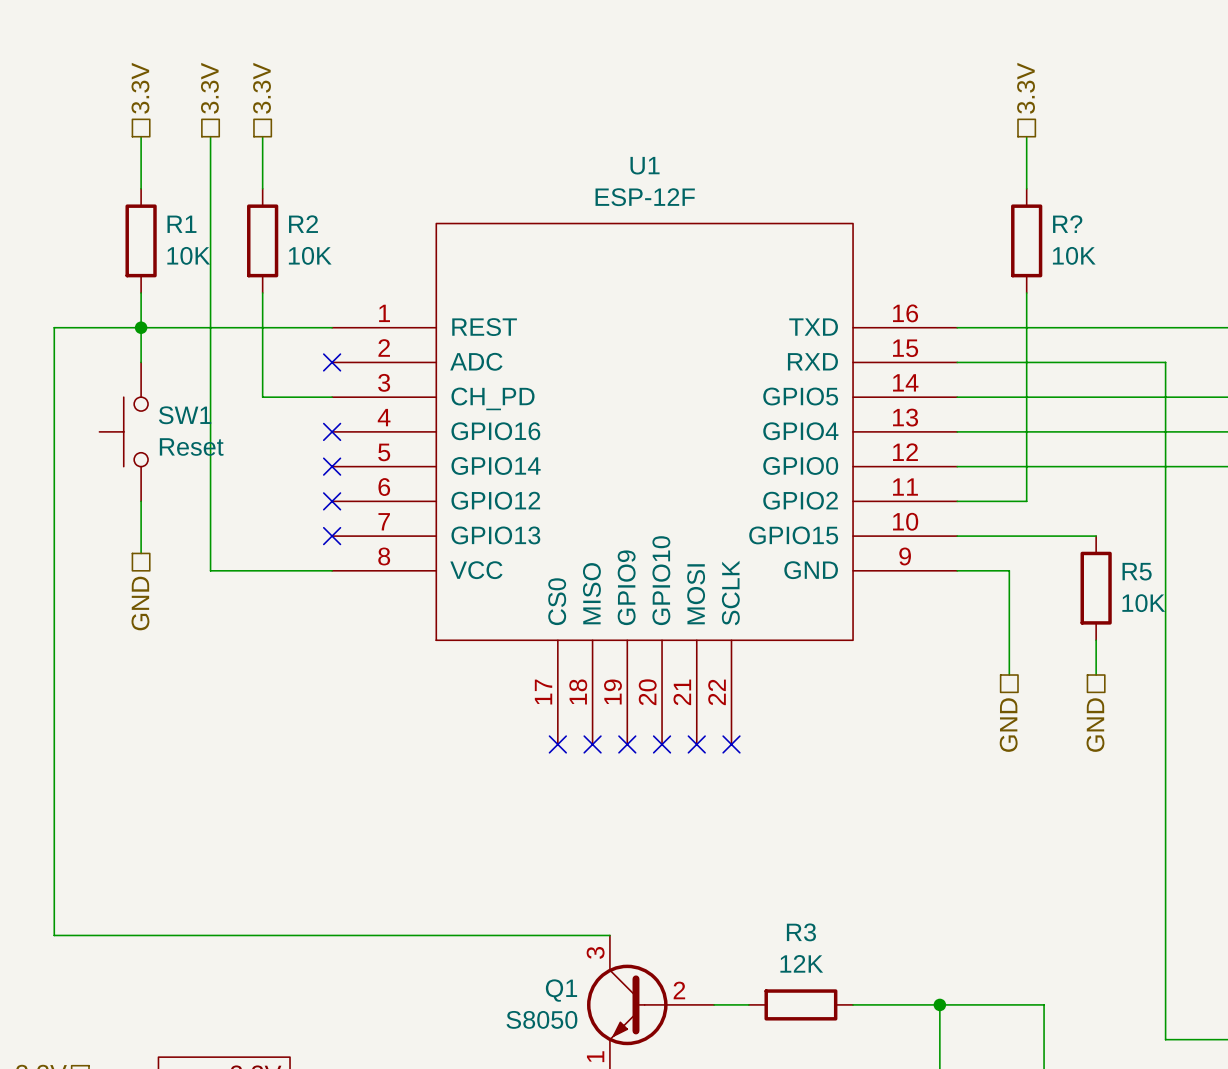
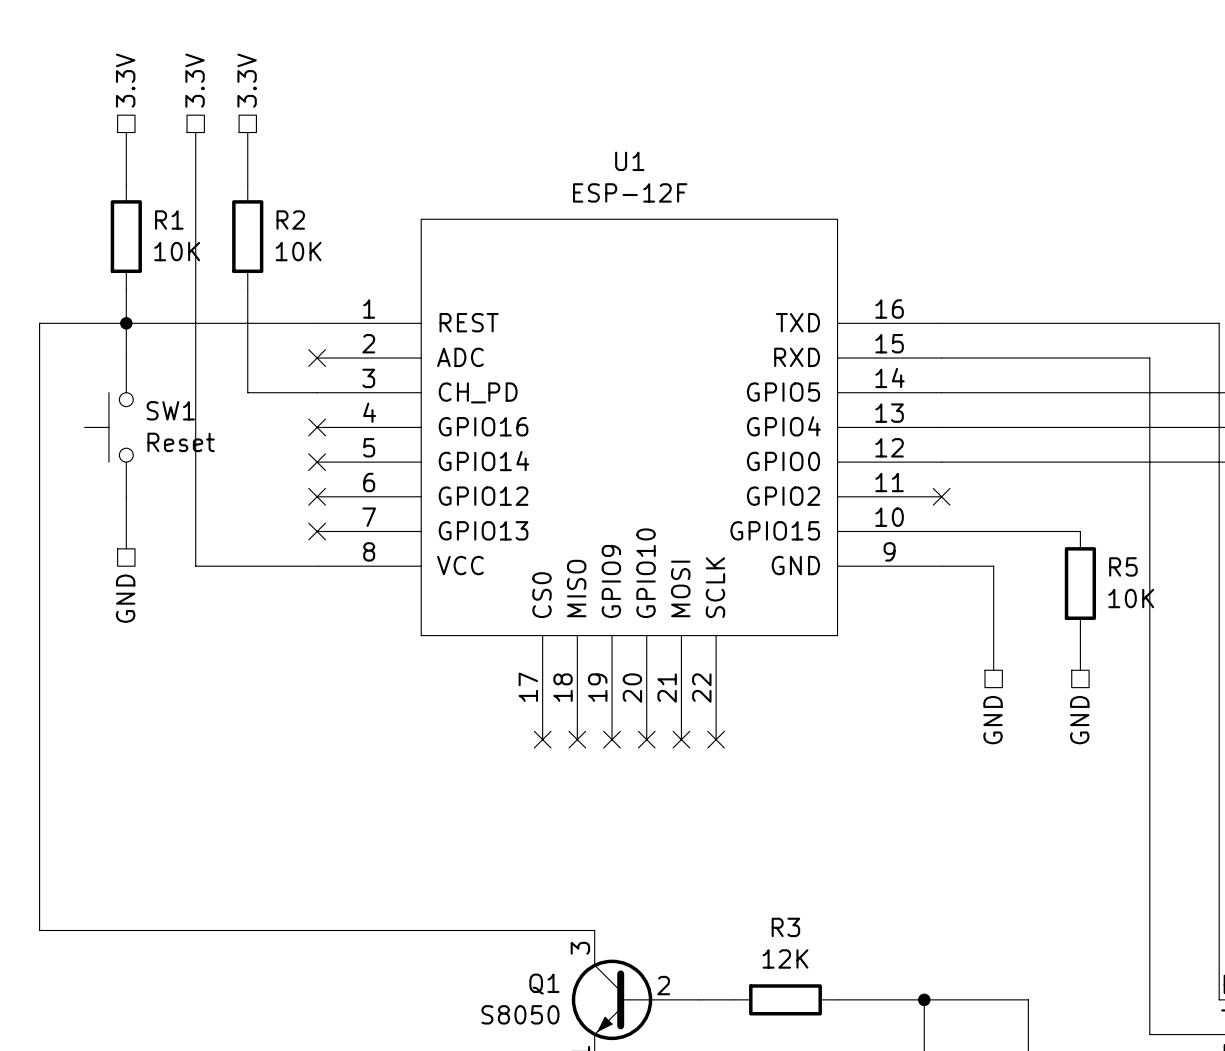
hierarchical label: 3.3V (1026, 88) -> none
wire: (1026, 136) (1026, 188) -> none
R?: 10K (1026, 240) -> none
wire: (1026, 292) (1026, 501) (957, 501) -> none
no-connect mark: none -> (941, 496)

